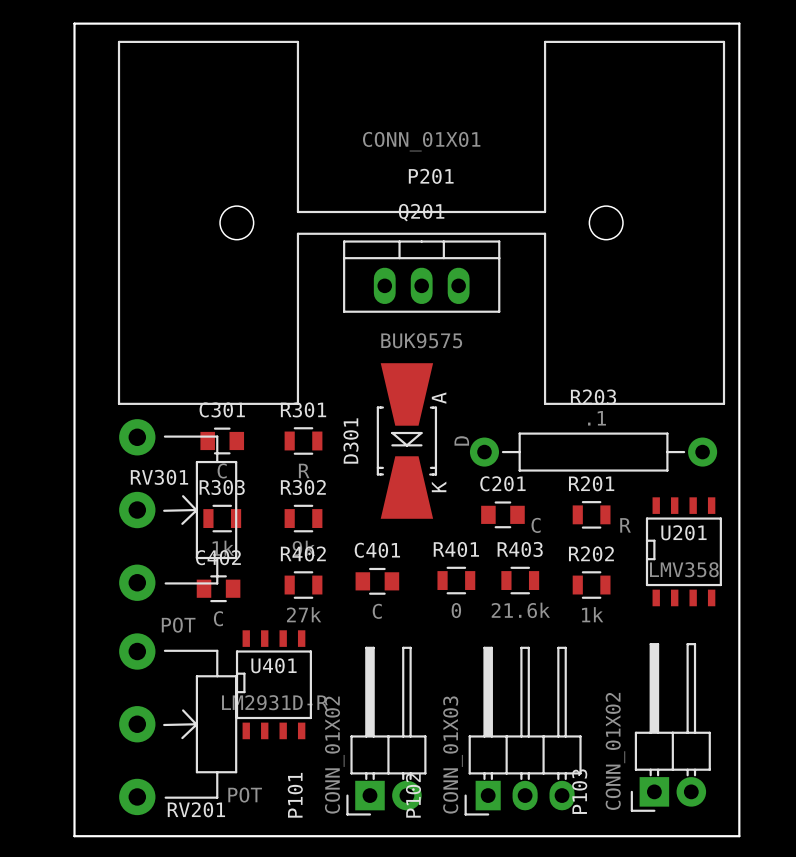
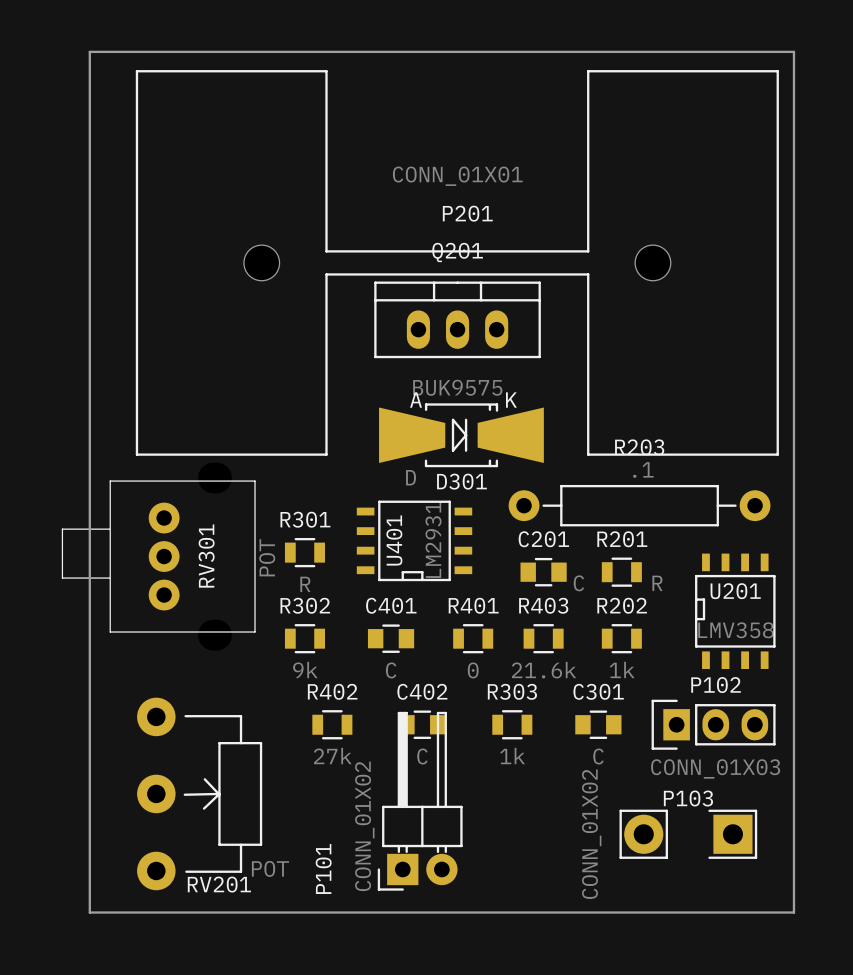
RV301 footprint: [119, 419, 238, 601] -> [61, 462, 256, 651]
C301 position: (222, 440) -> (598, 724)
R301 position: (303, 440) -> (304, 552)
D301 rotation: 0° (406, 440) -> 90° counterclockwise (461, 435)
D301 value position: D (461, 440) -> D (411, 477)
RV301 name position: RV301 (159, 477) -> RV301 (206, 556)
R201 position: (591, 514) -> (621, 572)
R303 position: (222, 518) -> (512, 724)
R302 position: (303, 518) -> (304, 638)
R401 position: (456, 580) -> (473, 638)
R403 position: (520, 580) -> (543, 638)
C401 position: (377, 581) -> (391, 638)
R402 position: (303, 585) -> (332, 724)
R202 position: (591, 585) -> (621, 638)
C402 position: (218, 588) -> (422, 724)
RV301 value position: POT (178, 625) -> POT (267, 557)
P103 footprint: [630, 643, 711, 812] -> [619, 809, 758, 859]
P102 footprint: [464, 646, 582, 816] -> [651, 699, 776, 750]
U401 rotation: 0° (273, 684) -> 90° counterclockwise (414, 540)
U401 position: (273, 684) -> (414, 540)
U401 value: LM2931D-R (275, 702) -> LM2931 (433, 540)
P103 value position: CONN_01X02 (615, 751) -> CONN_01X02 (591, 834)
P102 value position: CONN_01X03 (452, 755) -> CONN_01X03 (715, 768)
P103 name position: P103 (579, 791) -> P103 (688, 798)
P102 name position: P102 (413, 795) -> P102 (716, 685)

